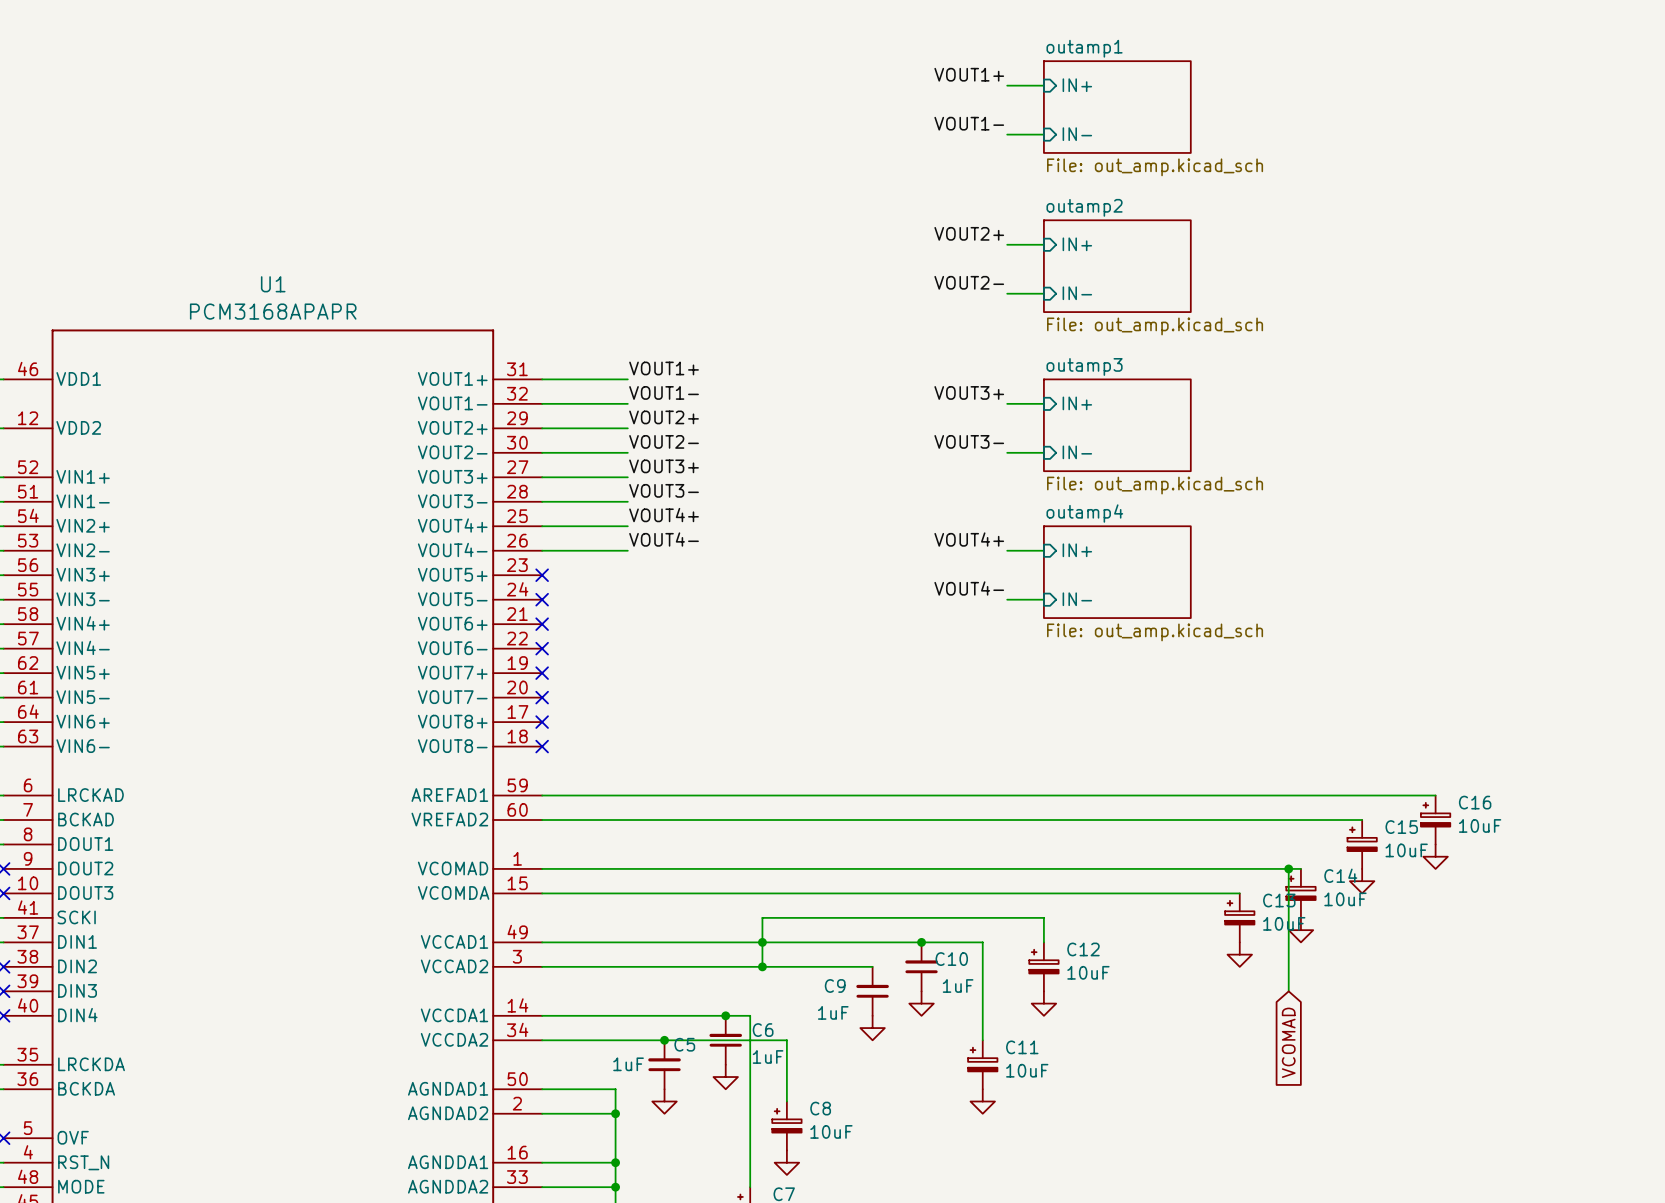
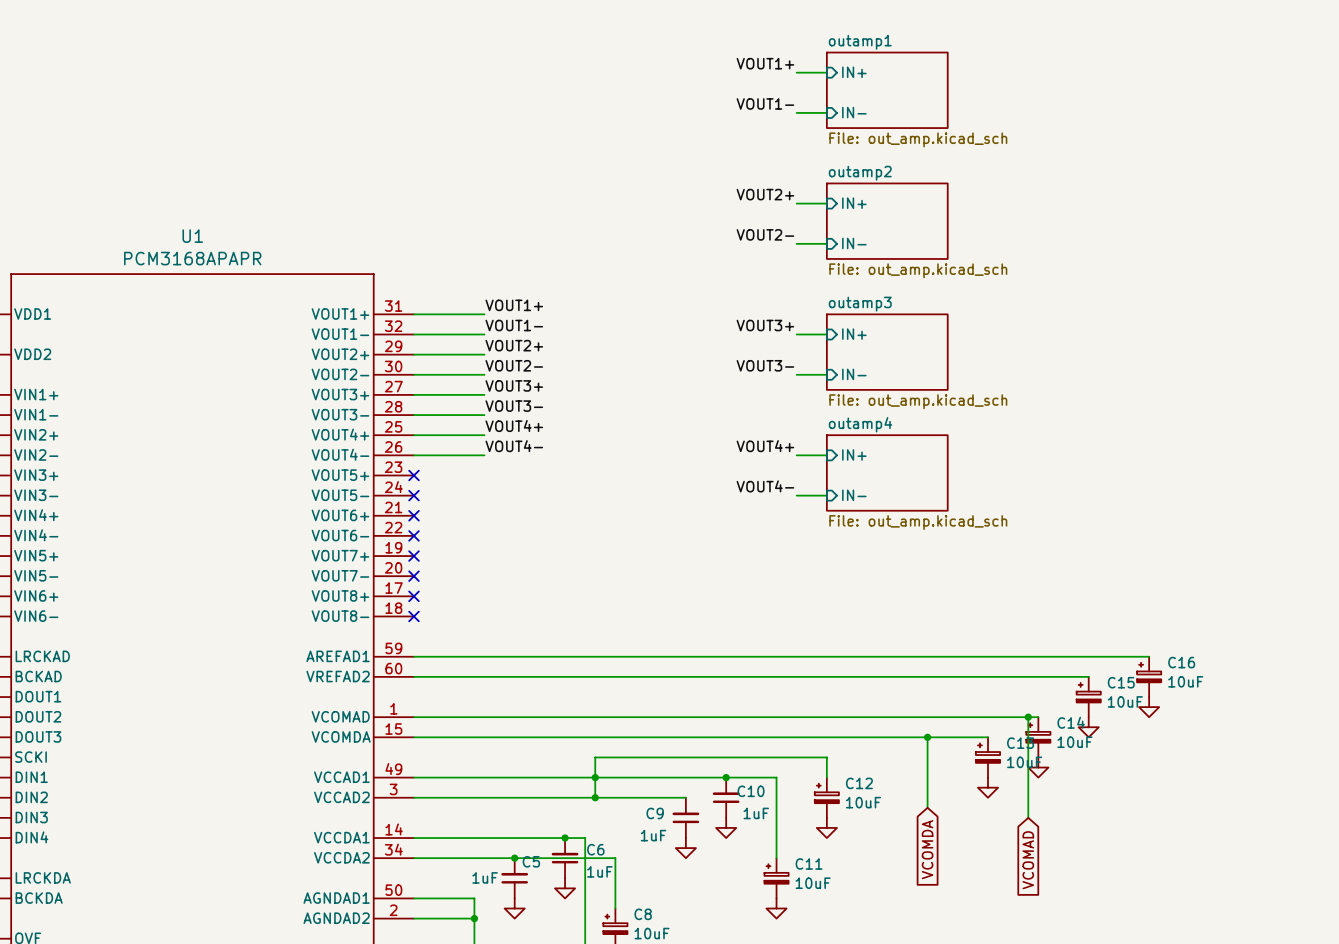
wire: none -> (927, 737) (927, 807)
junction: none -> (927, 737)
global label: none -> VCOMDA (927, 849)

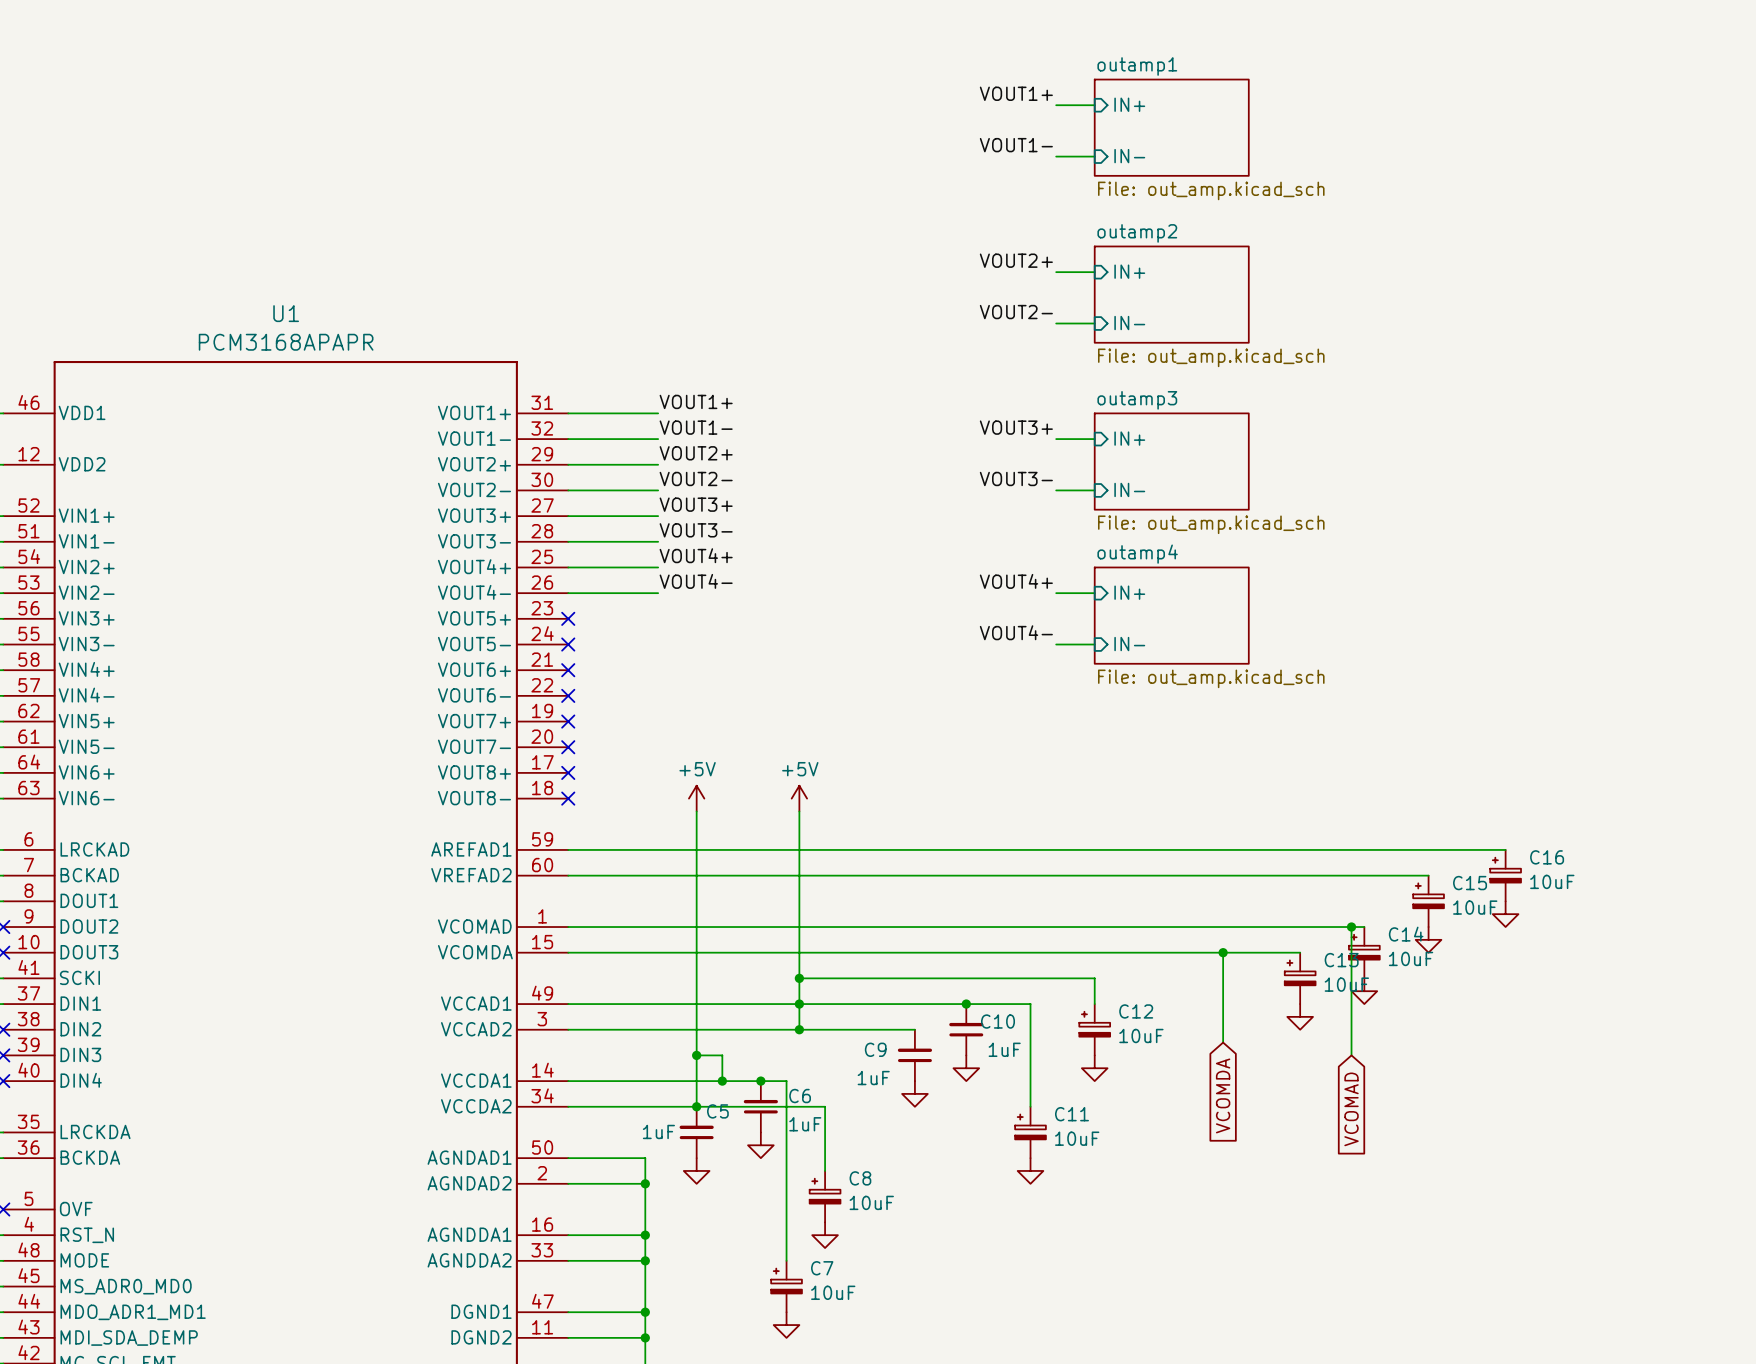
power symbol: none -> +5V (696, 798)
power symbol: none -> +5V (799, 798)
wire: none -> (696, 811) (696, 1106)
wire: none -> (799, 811) (799, 978)
junction: none -> (799, 978)
wire: none -> (696, 1055) (722, 1055) (722, 1081)
junction: none -> (696, 1055)
junction: none -> (722, 1081)

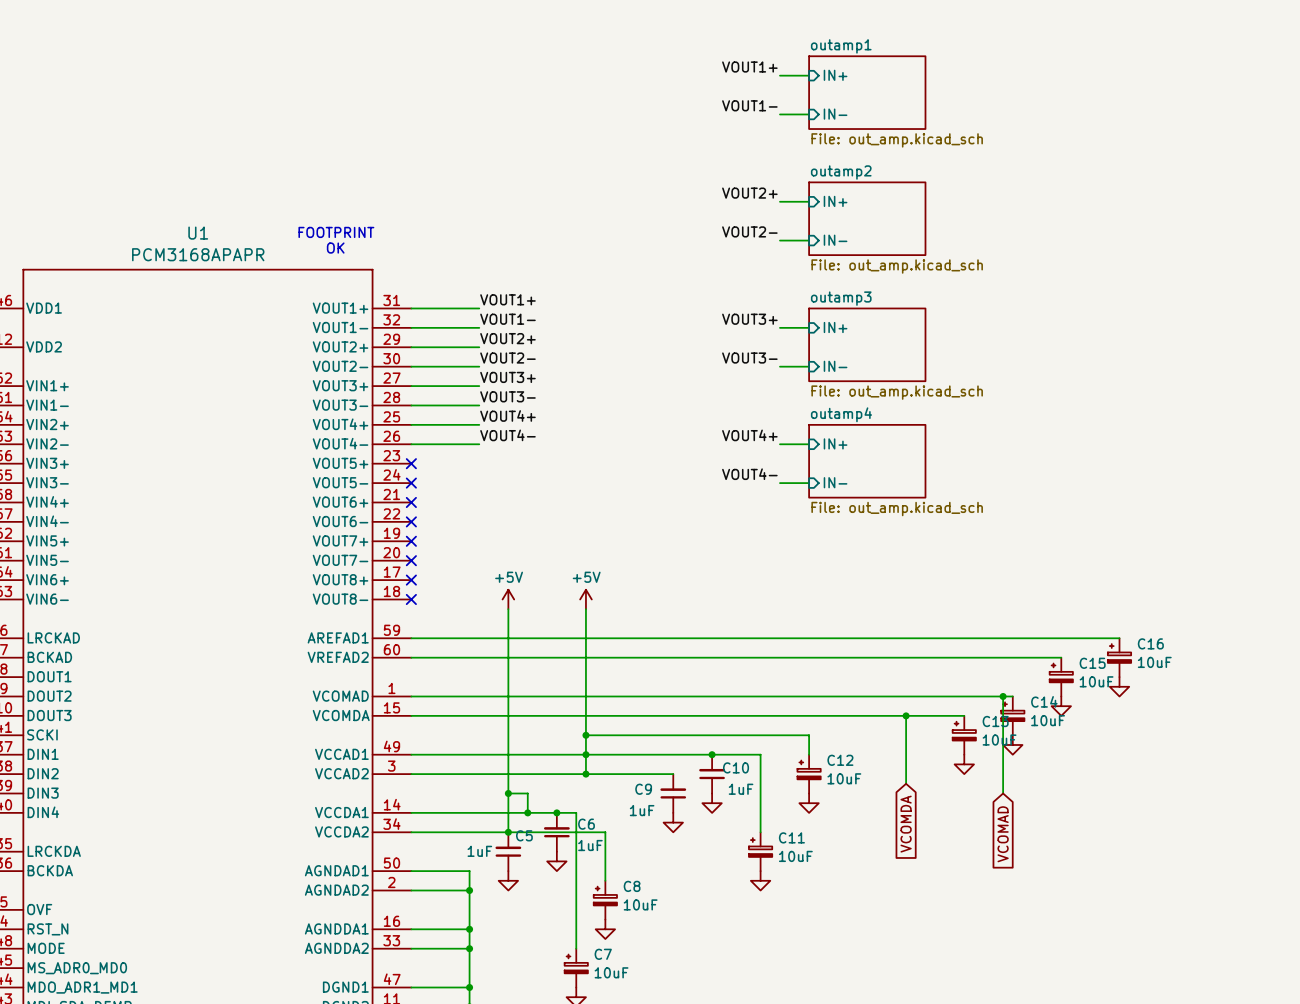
text: none -> FOOTPRINT (336, 232)
text: none -> OK (335, 248)

